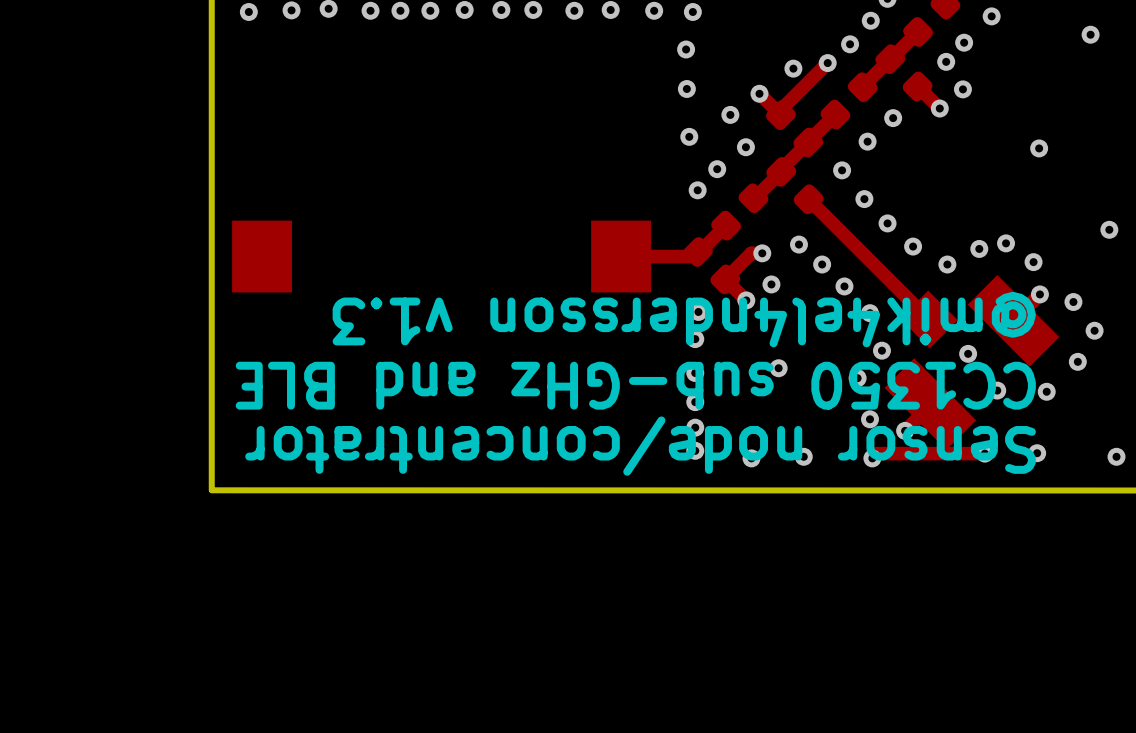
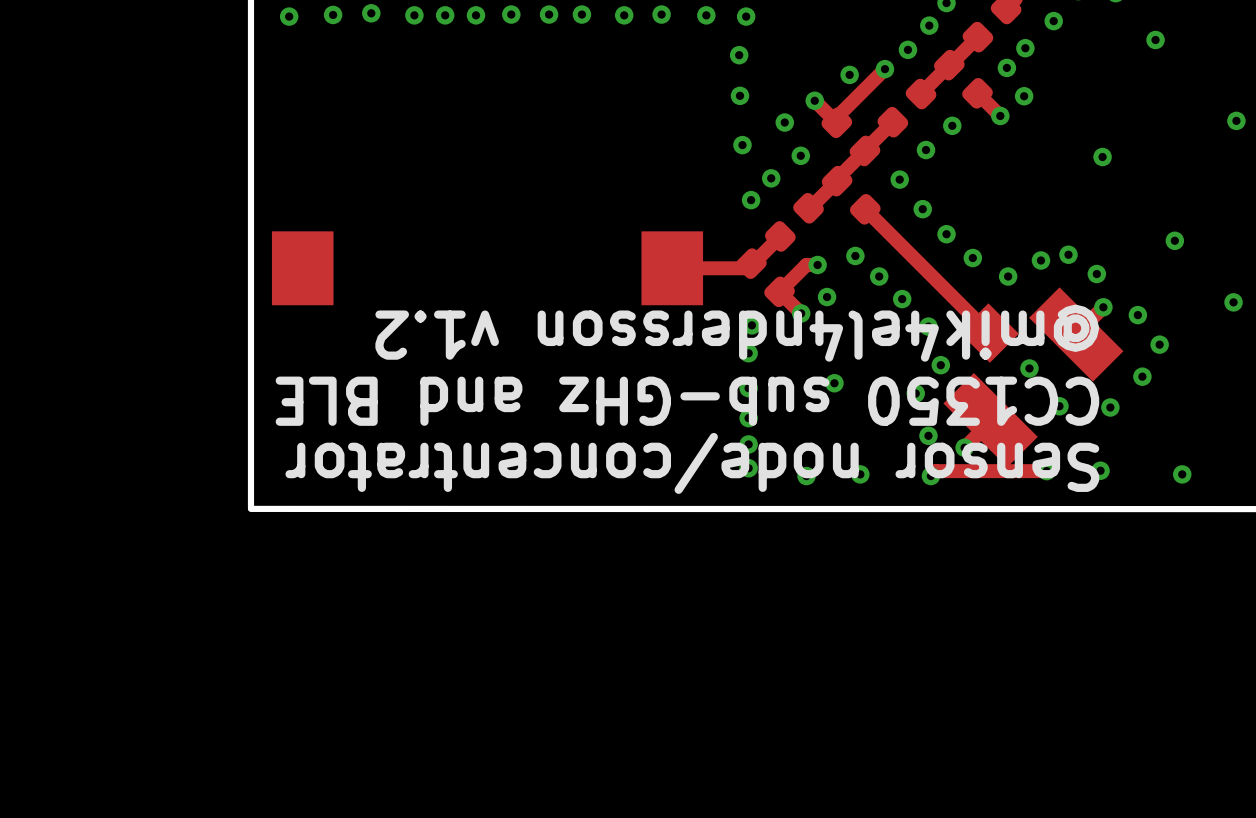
text: @mik4el4ndersson v1.3 (684, 319) -> @mik4el4ndersson v1.2 (737, 333)

